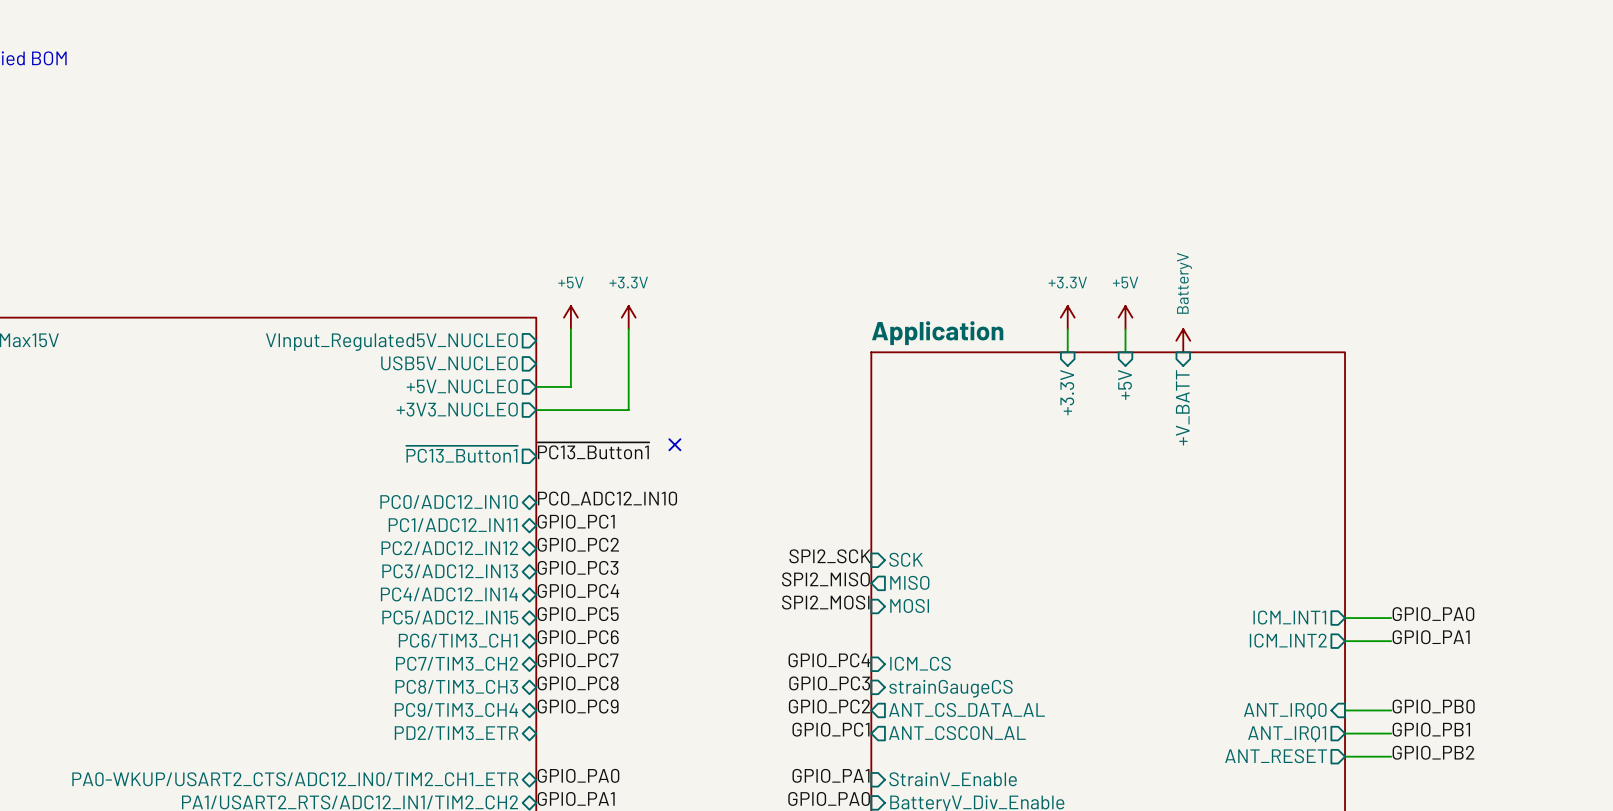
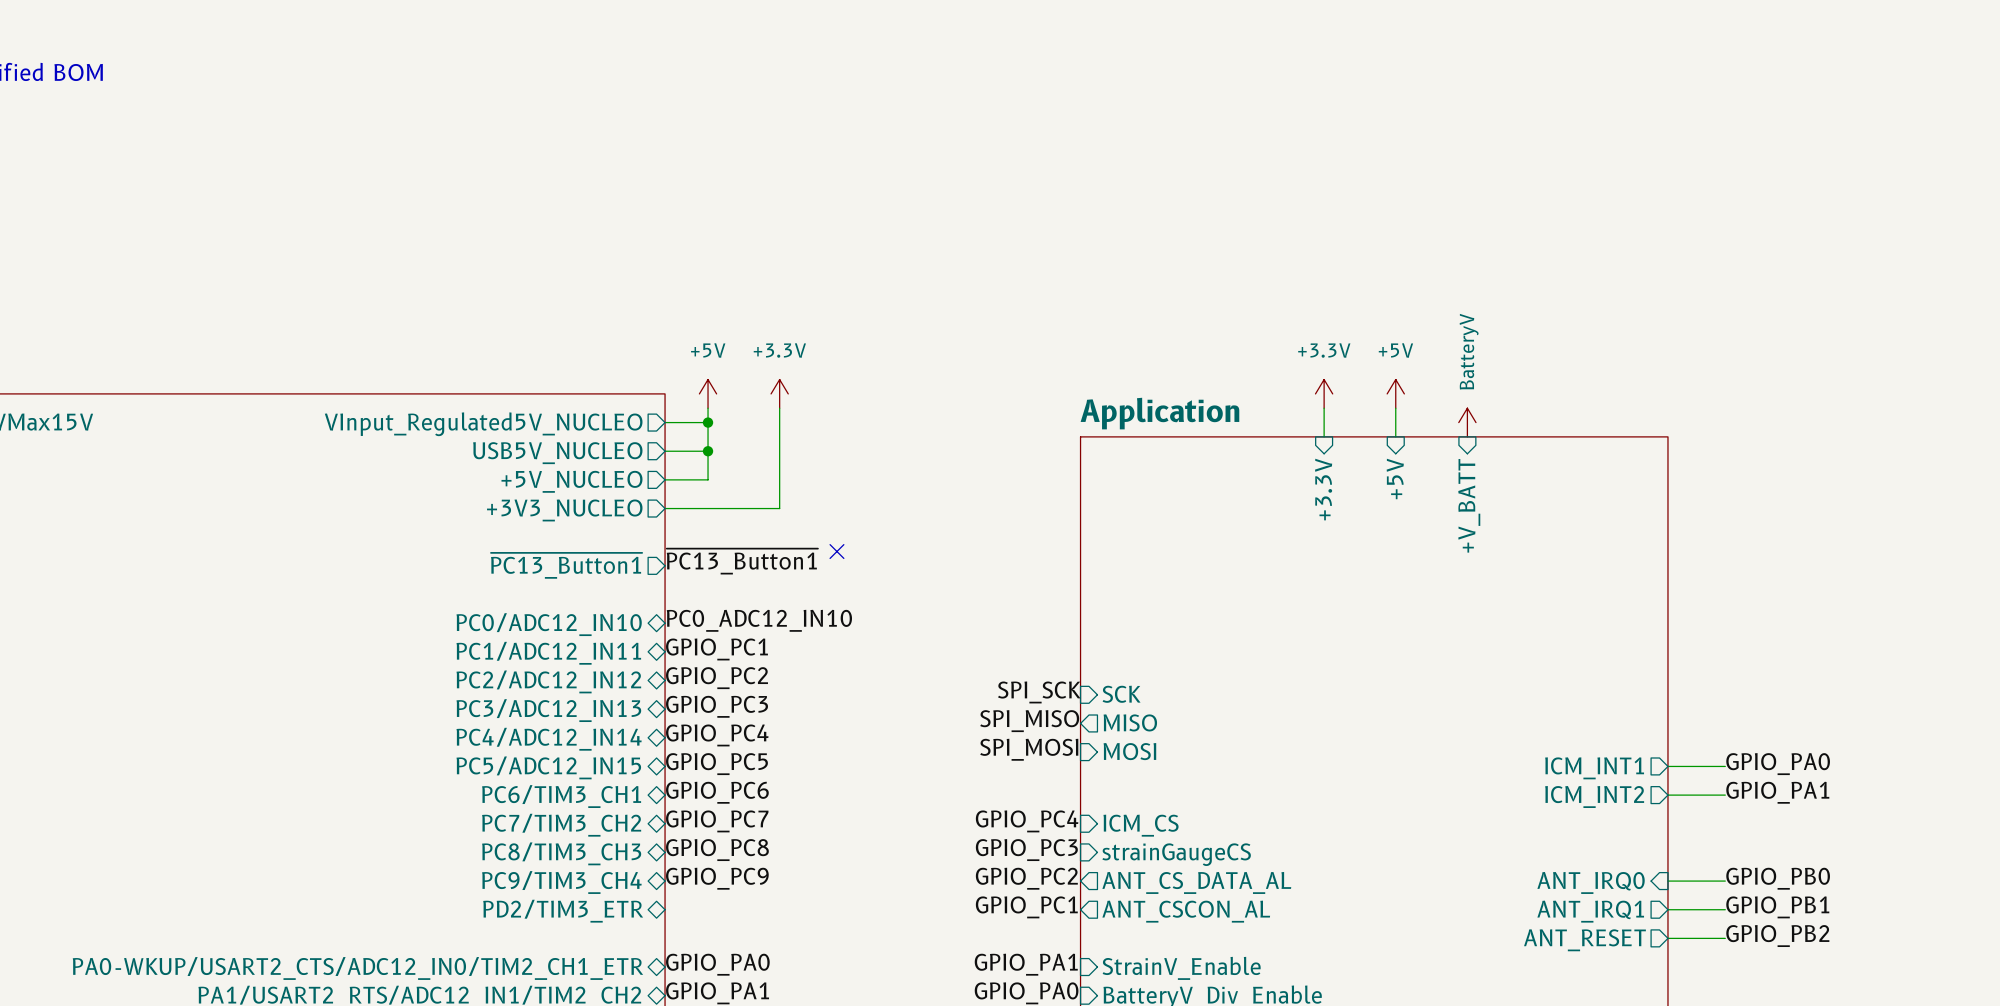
wire: none -> (665, 422) (708, 422)
junction: none -> (708, 422)
wire: none -> (665, 451) (708, 451)
junction: none -> (708, 451)
label: SPI2_SCK (830, 556) -> SPI_SCK (1039, 692)
label: SPI2_MISO (825, 579) -> SPI_MISO (1029, 721)
label: SPI2_MOSI (825, 602) -> SPI_MOSI (1029, 749)

